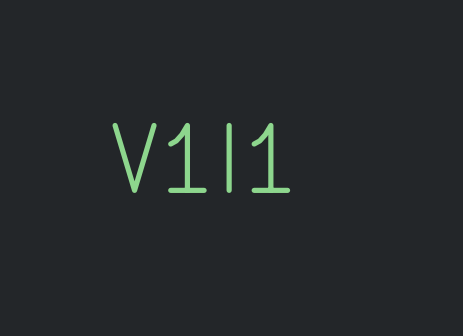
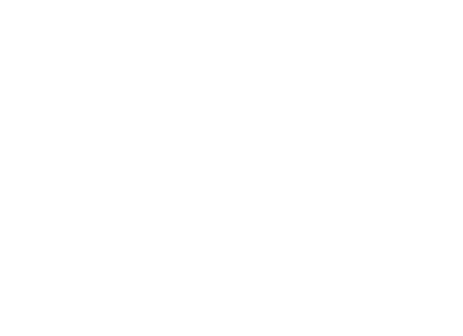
text: V1I1 (201, 157) -> none

